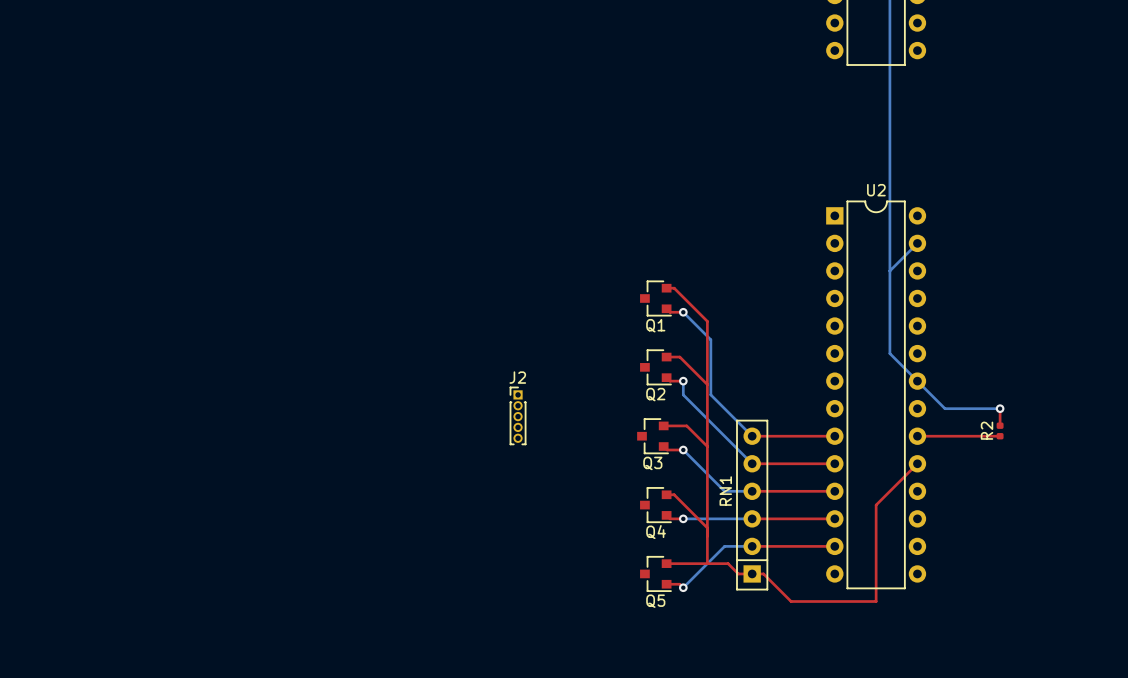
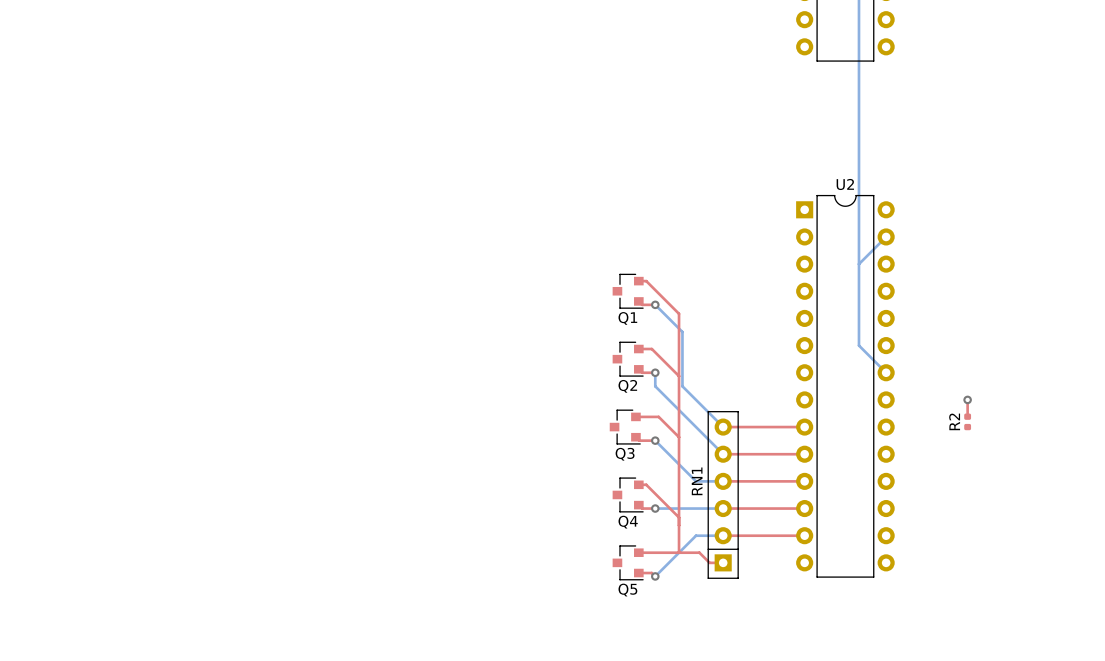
bottom track: (917, 381) (945, 408) (1000, 408) -> none
J2: (518, 415) -> none
top track: (917, 436) (1000, 436) -> none
top track: (917, 463) (876, 505) (876, 601) (791, 601) (763, 573) (752, 573) -> none

